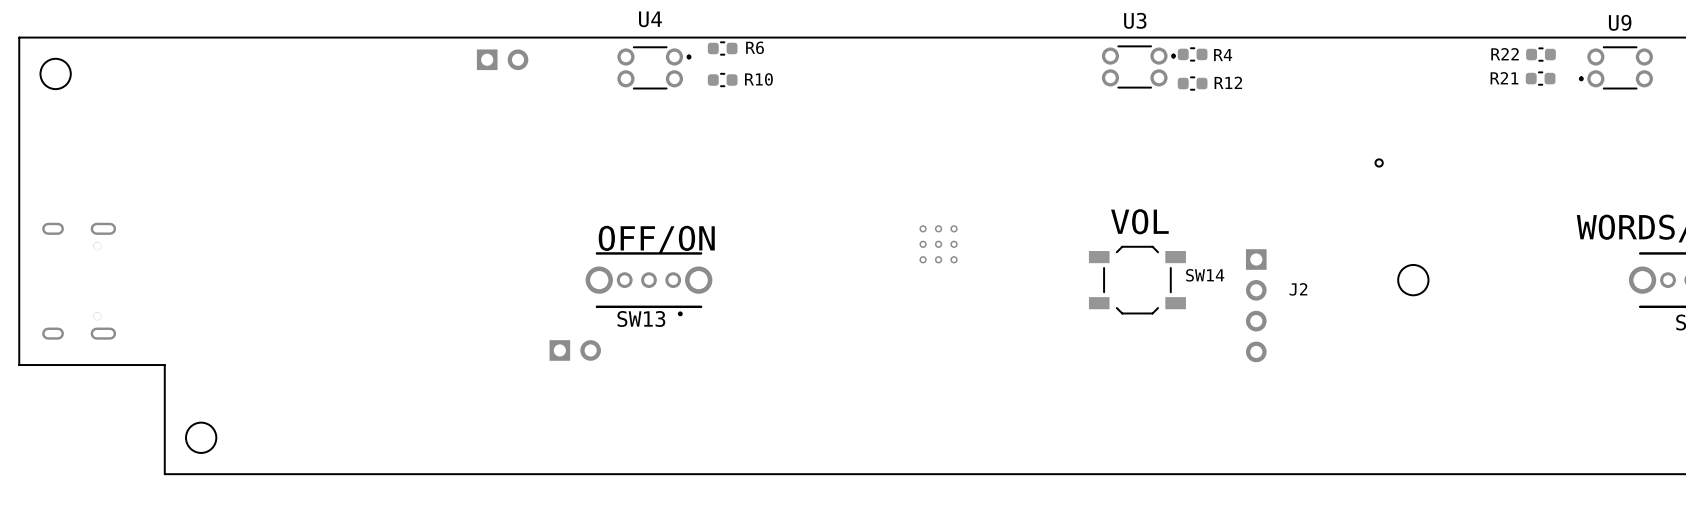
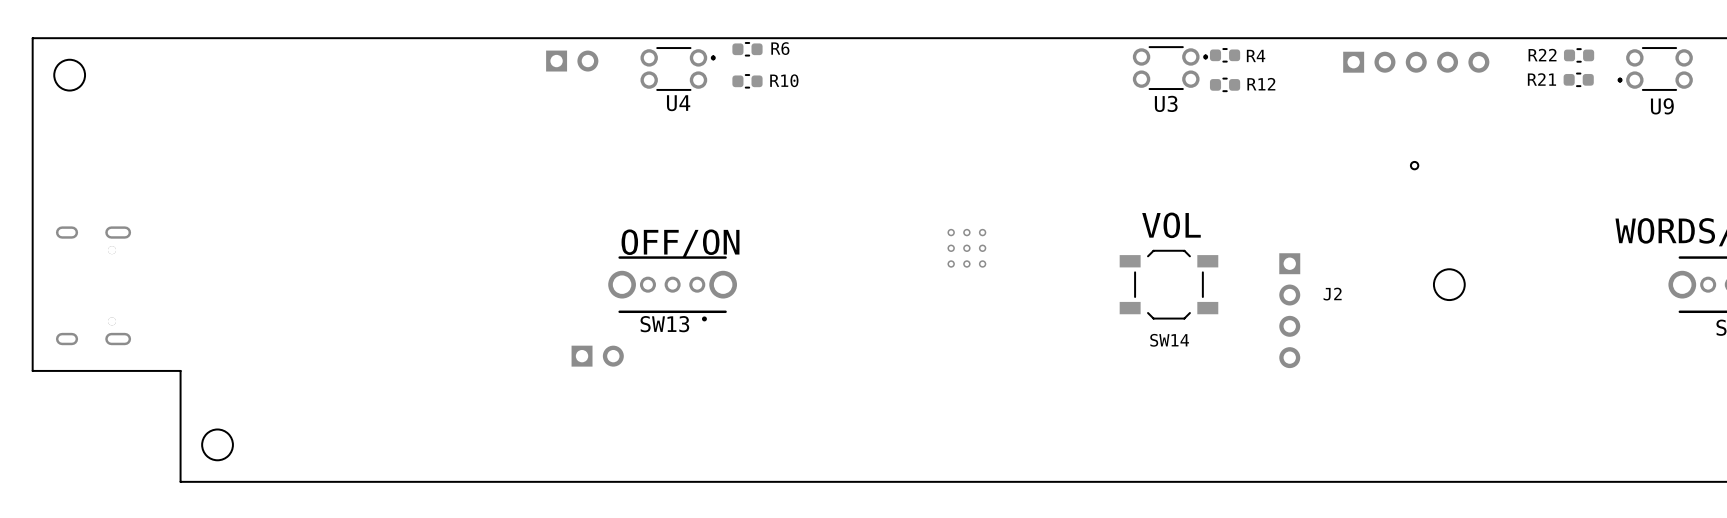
U4 name position: U4 (650, 19) -> U4 (678, 103)
U3 name position: U3 (1135, 20) -> U3 (1166, 103)
U9 name position: U9 (1620, 22) -> U9 (1662, 106)
part position: (502, 59) -> (572, 61)
part: none -> (1416, 62)
SW14 name position: SW14 (1205, 275) -> SW14 (1169, 340)

